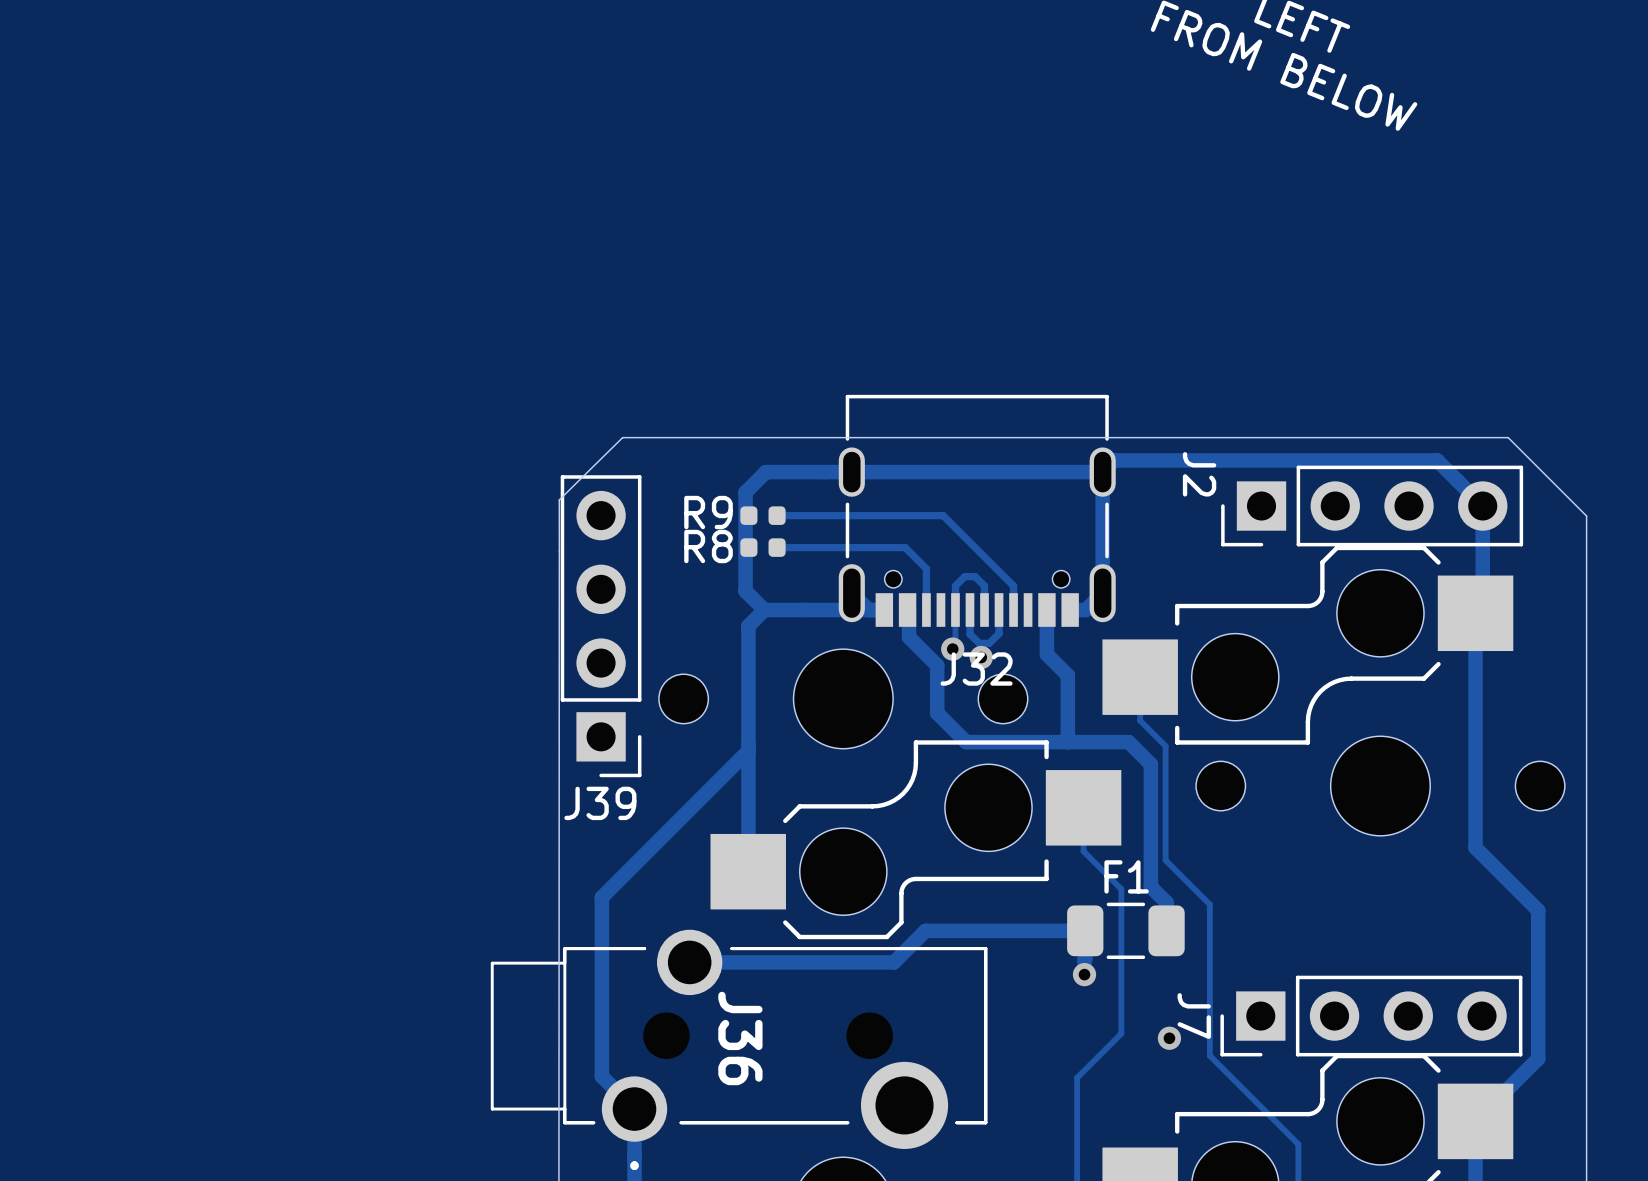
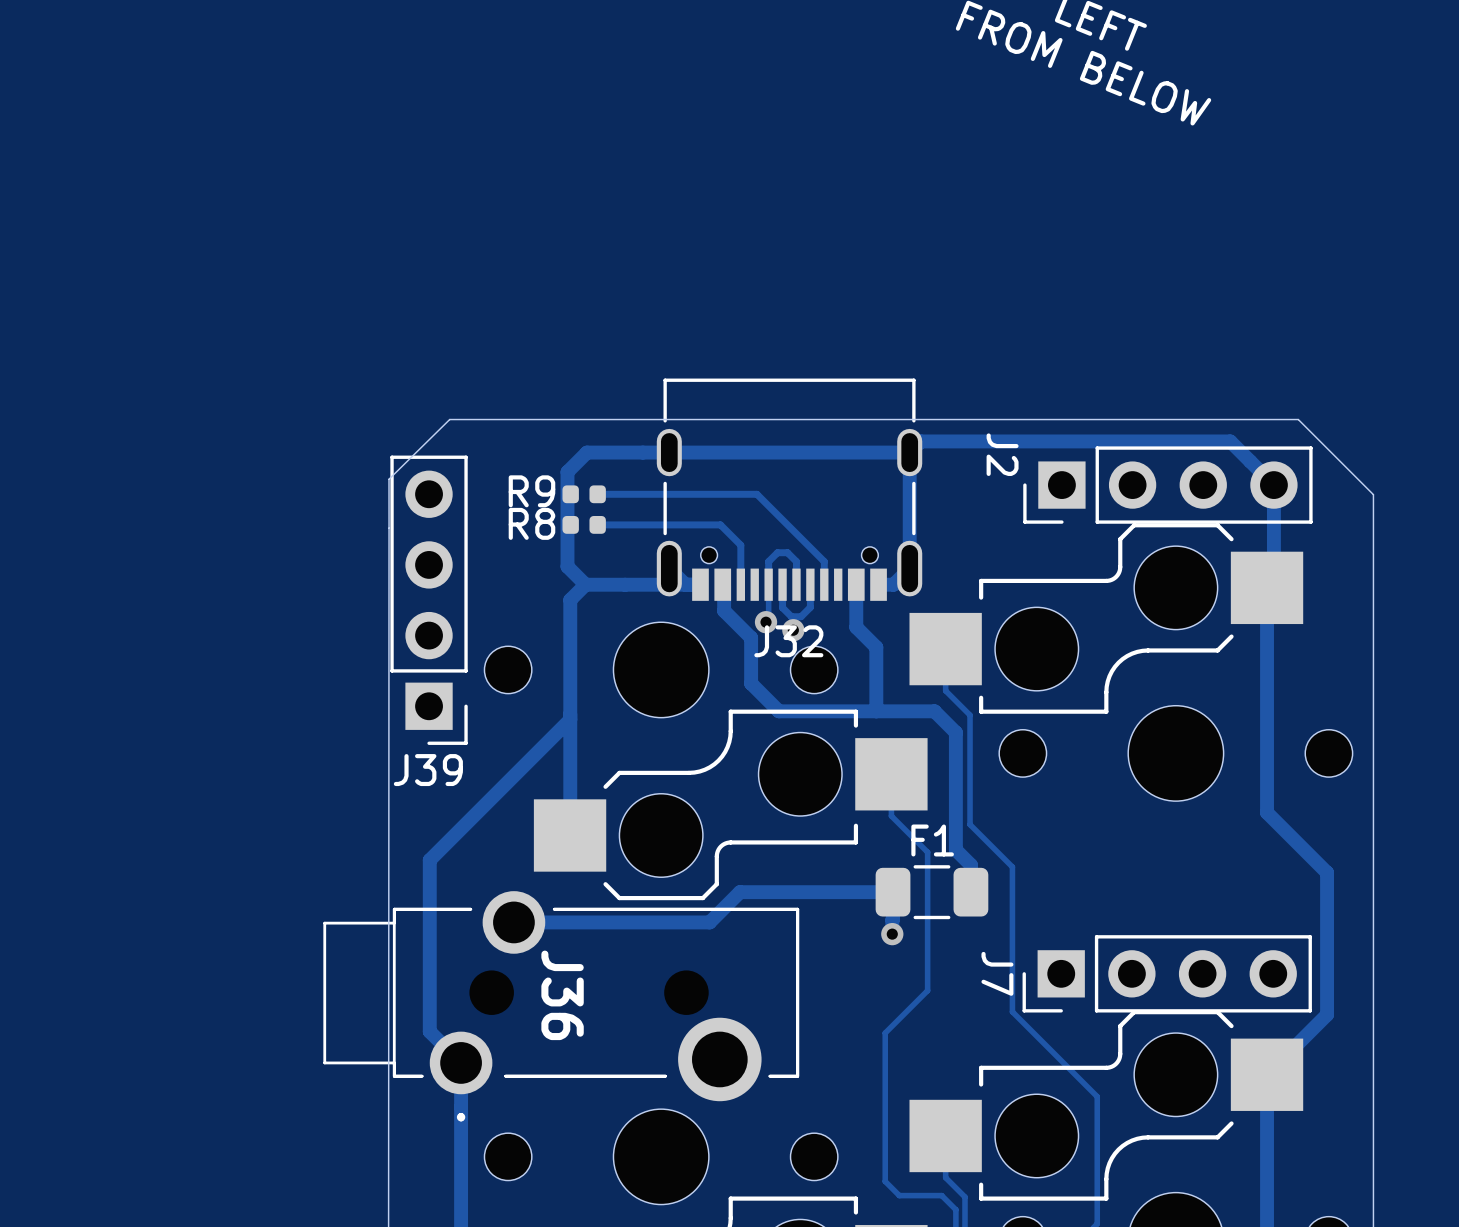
via: (1169, 1038) -> none

